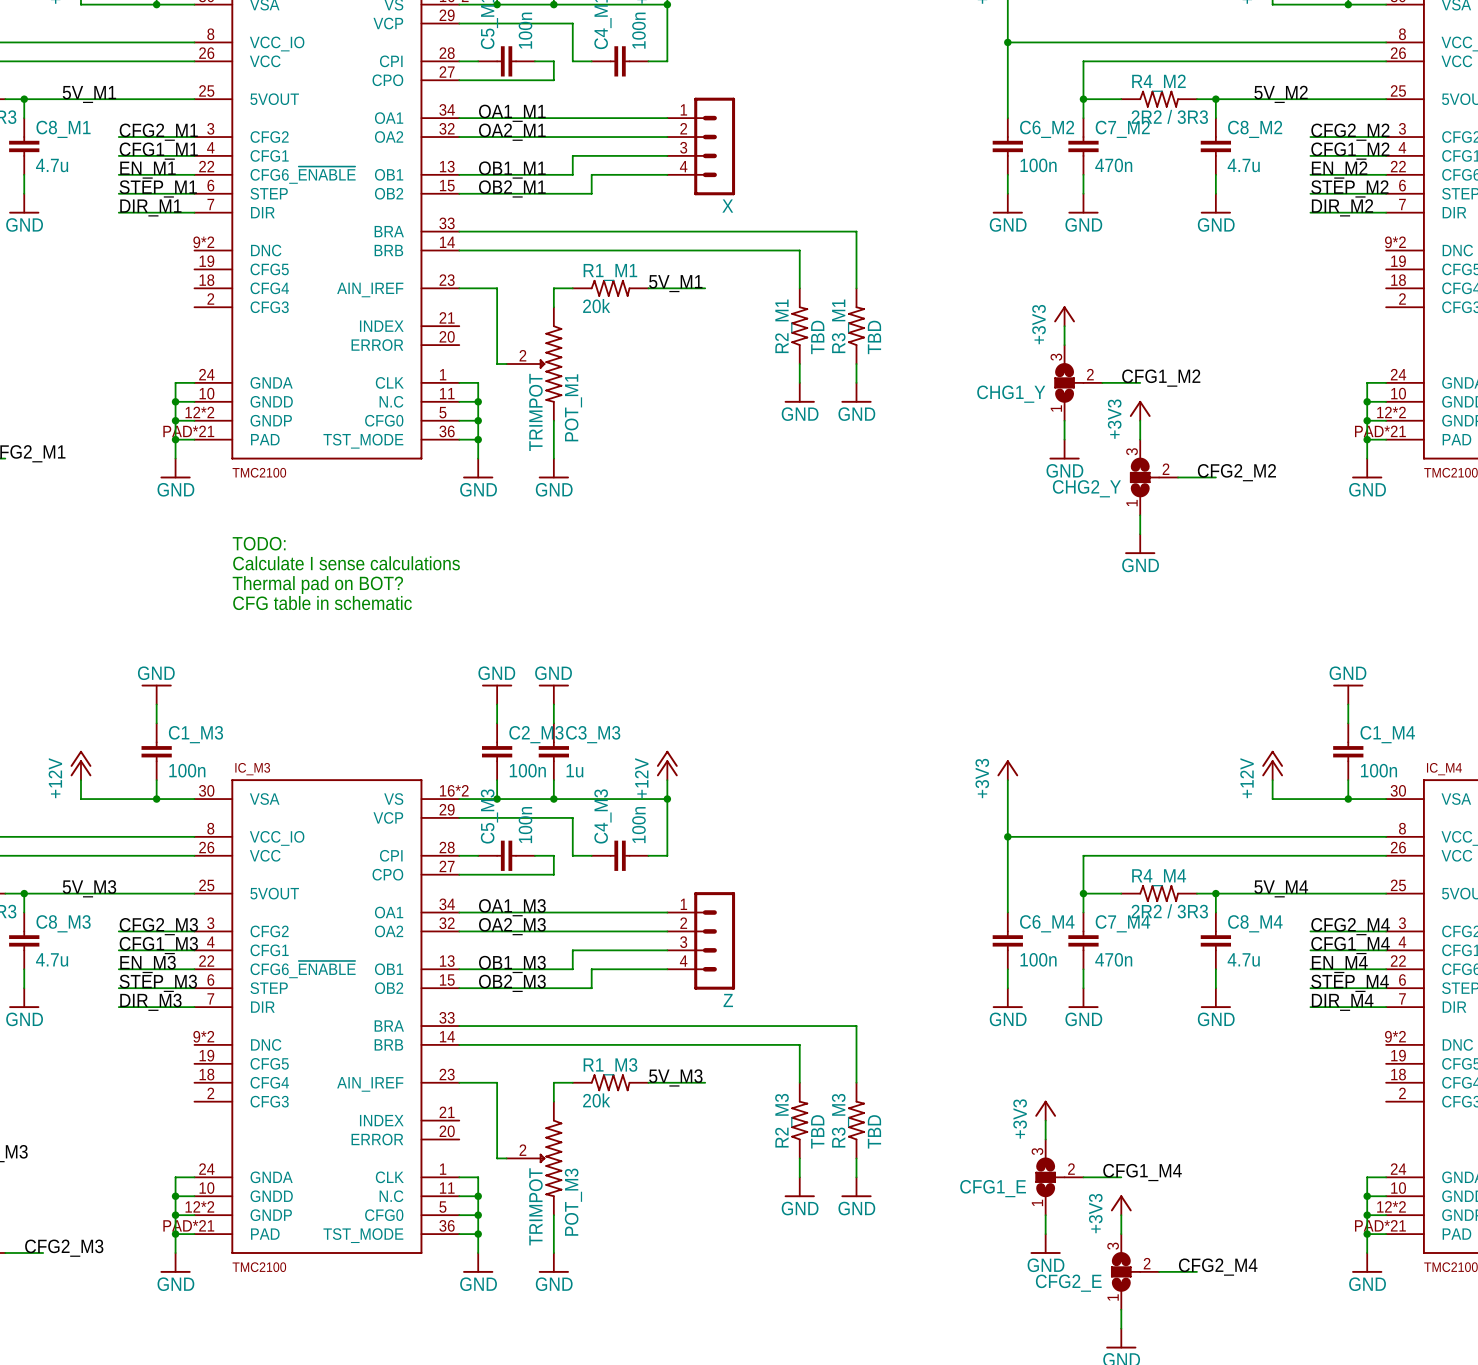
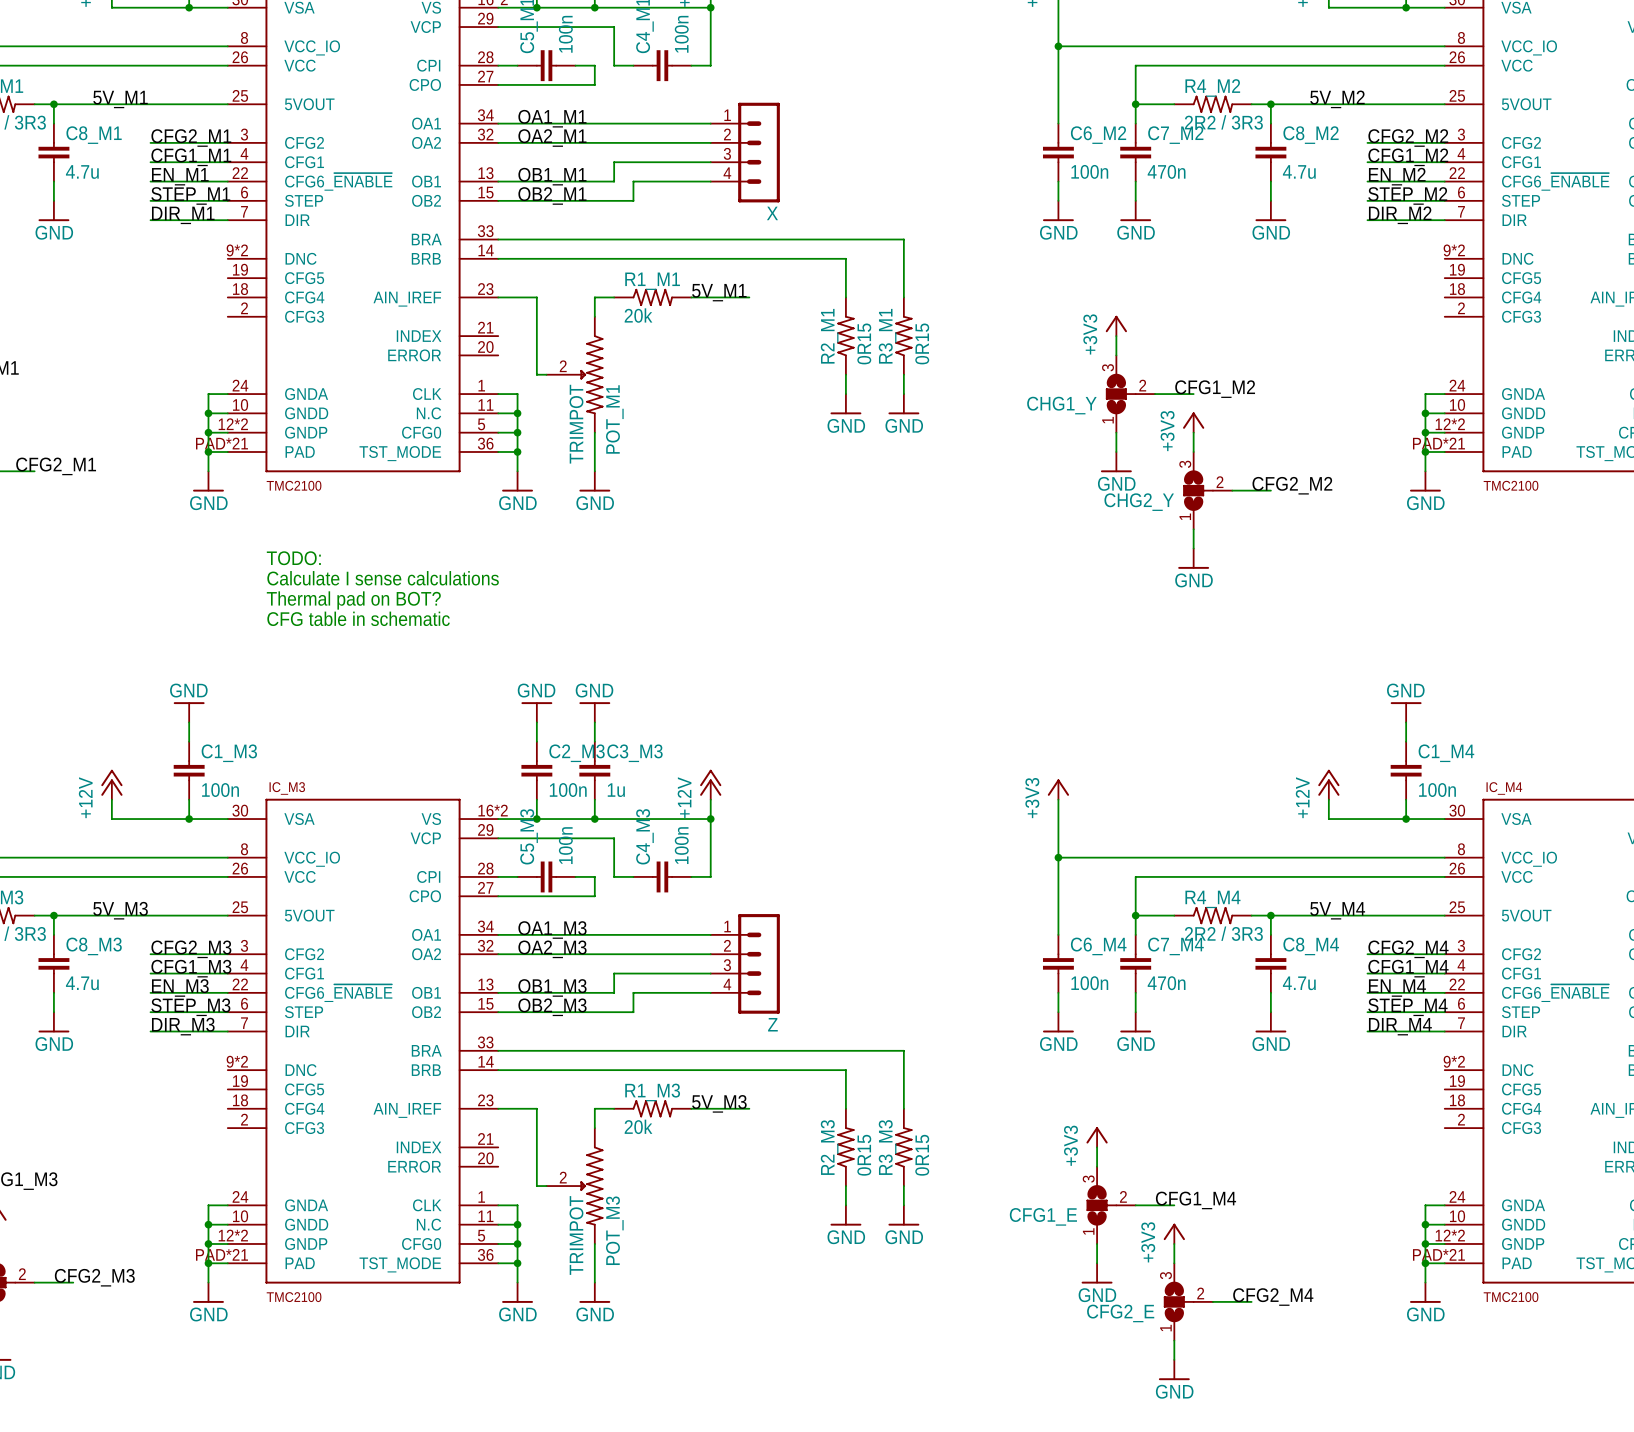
R2_M1 value: TBD (817, 337) -> 0R15 (864, 343)
R3_M1 value: TBD (874, 337) -> 0R15 (922, 343)
R2_M3 value: TBD (817, 1131) -> 0R15 (864, 1155)
R3_M3 value: TBD (874, 1131) -> 0R15 (922, 1155)

